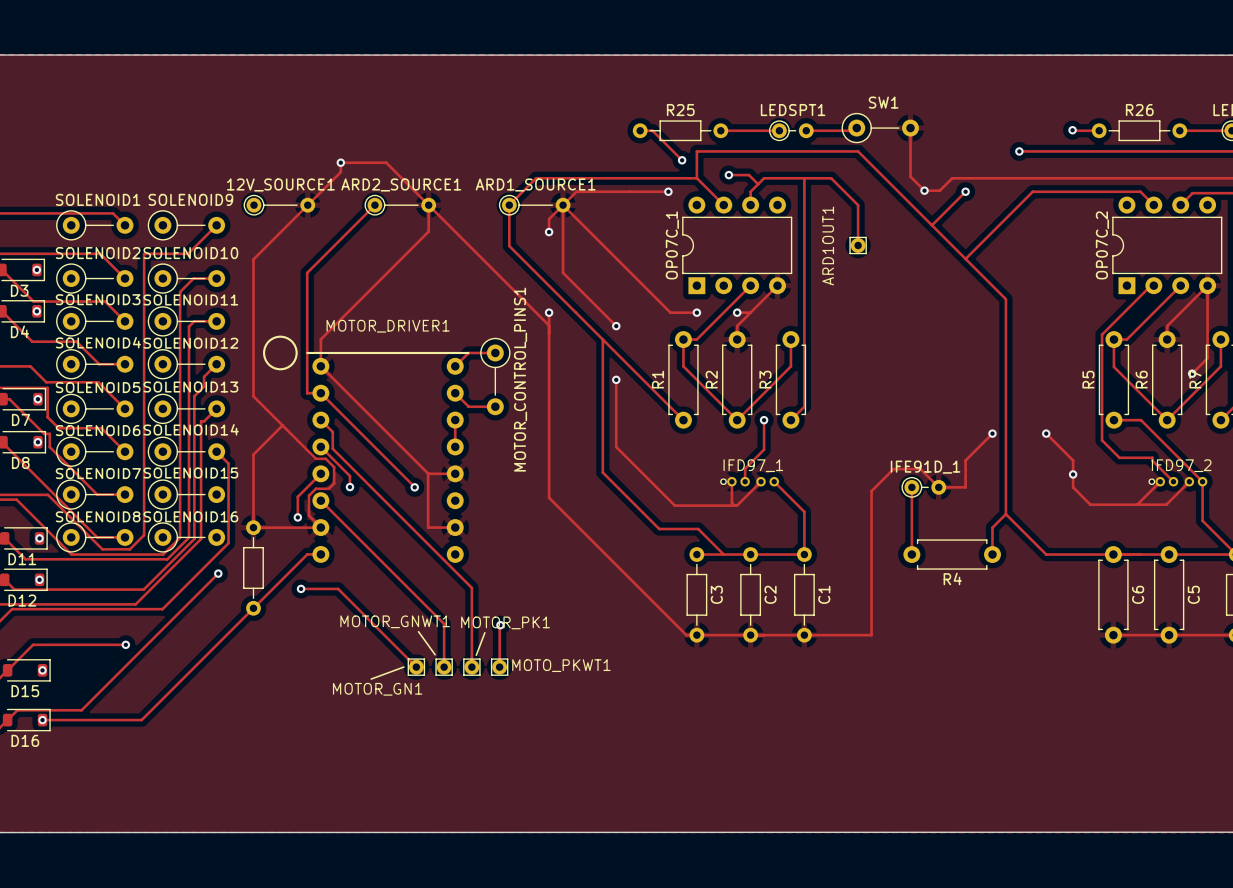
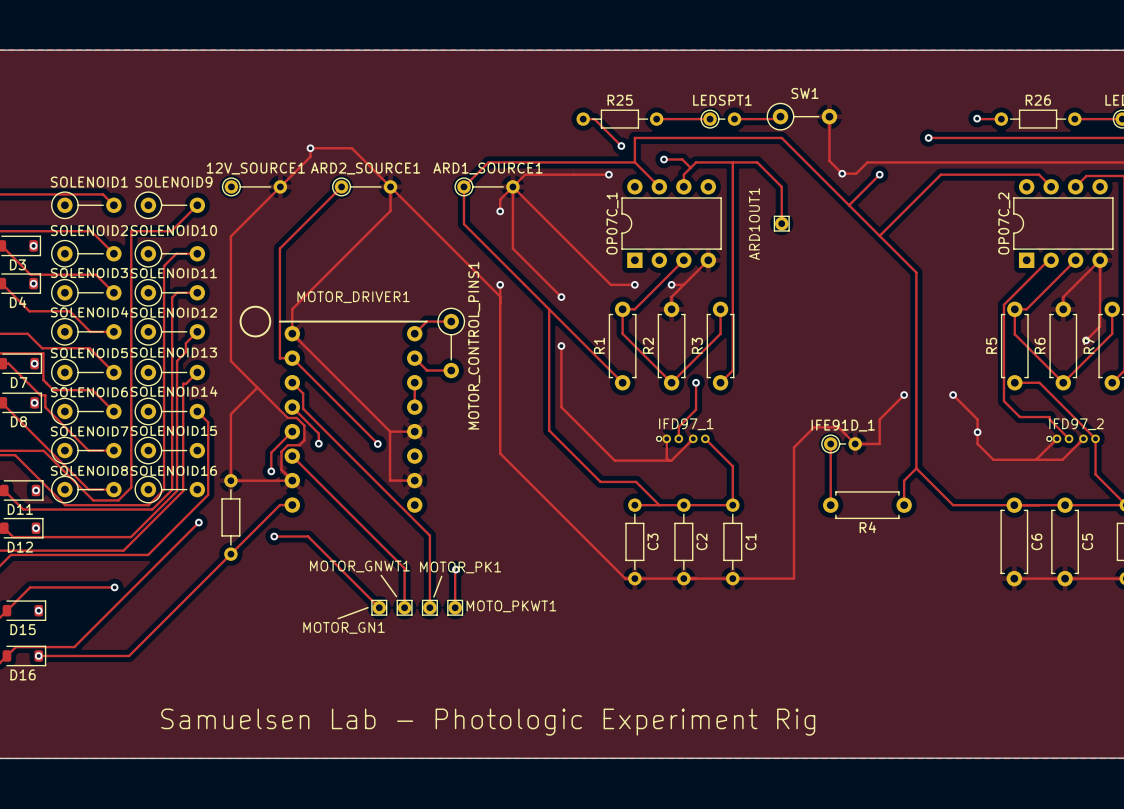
text: none -> Samuelsen Lab - Photologic Experiment Rig (488, 722)

